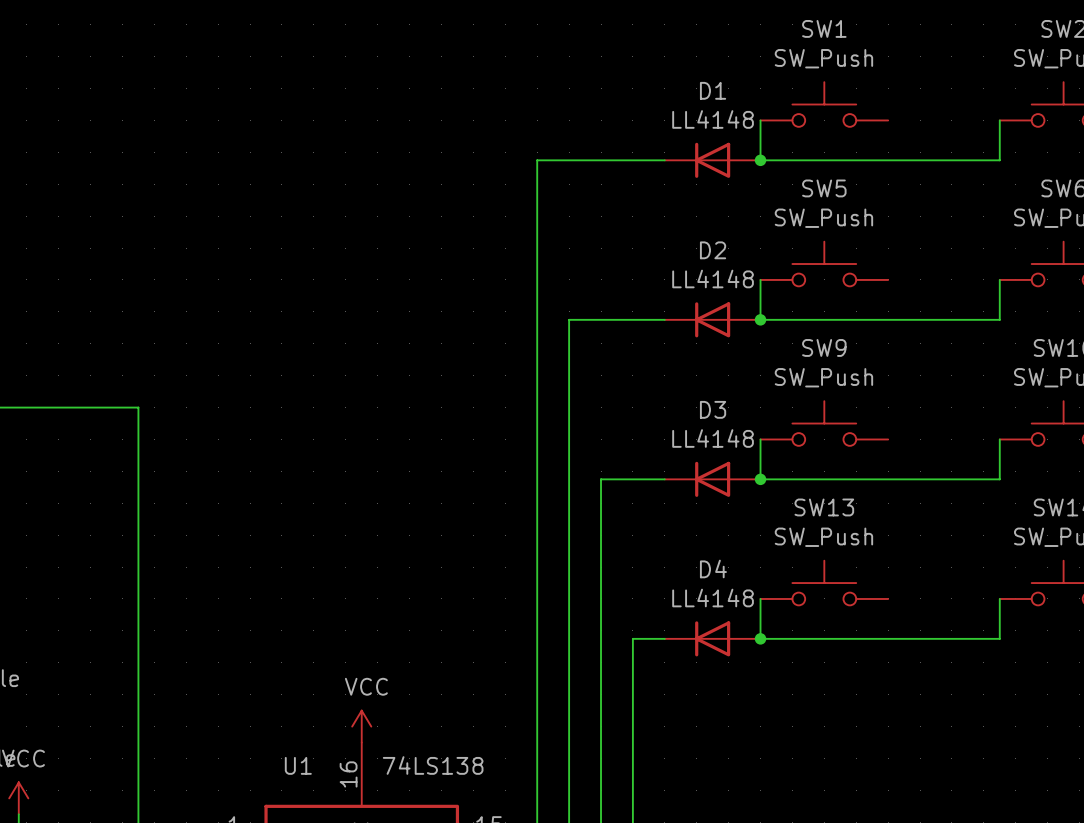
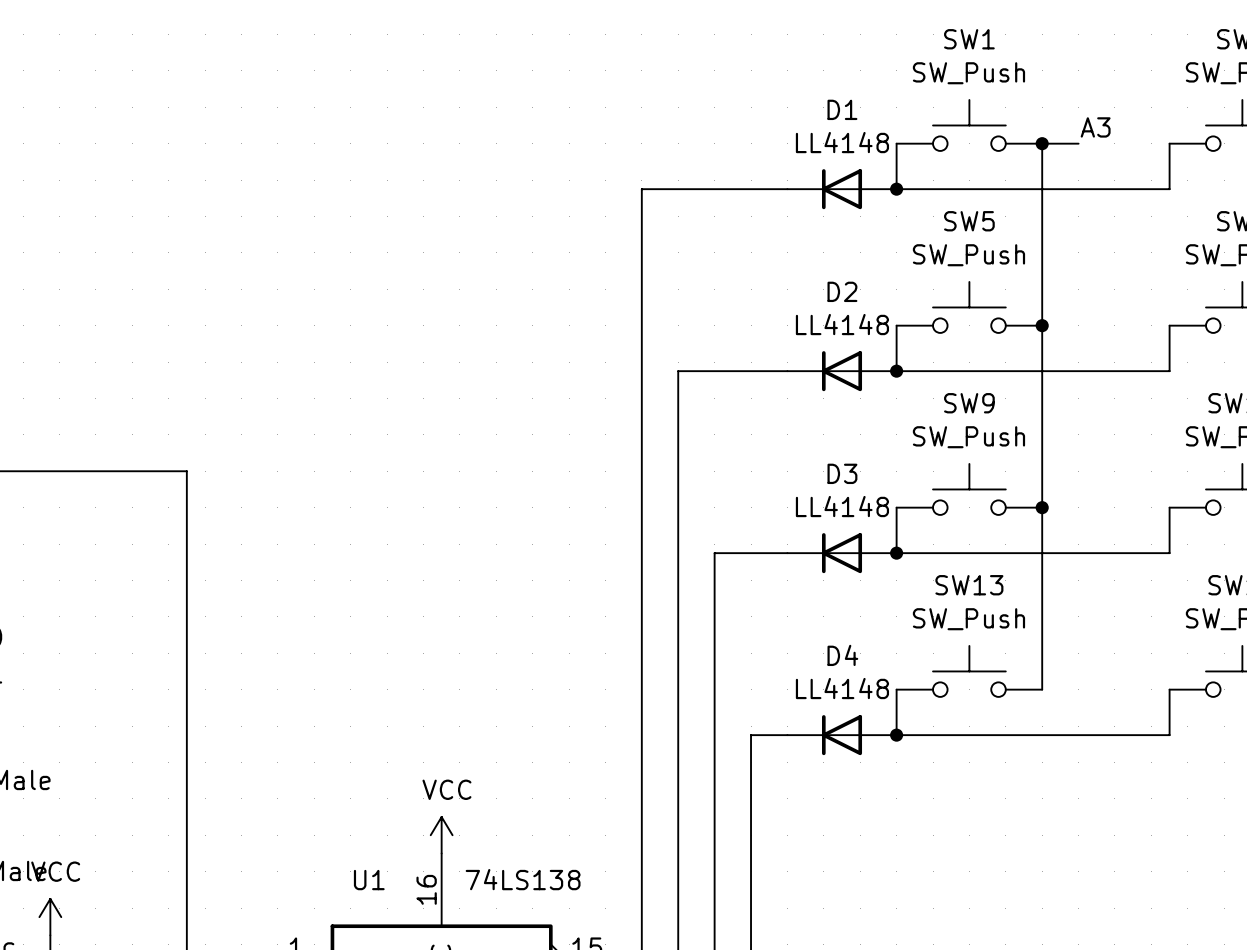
label: none -> A3 (1095, 127)
junction: none -> (1042, 143)
wire: none -> (1078, 143) (1042, 143) (1042, 689)
junction: none -> (1042, 325)
junction: none -> (1042, 507)

